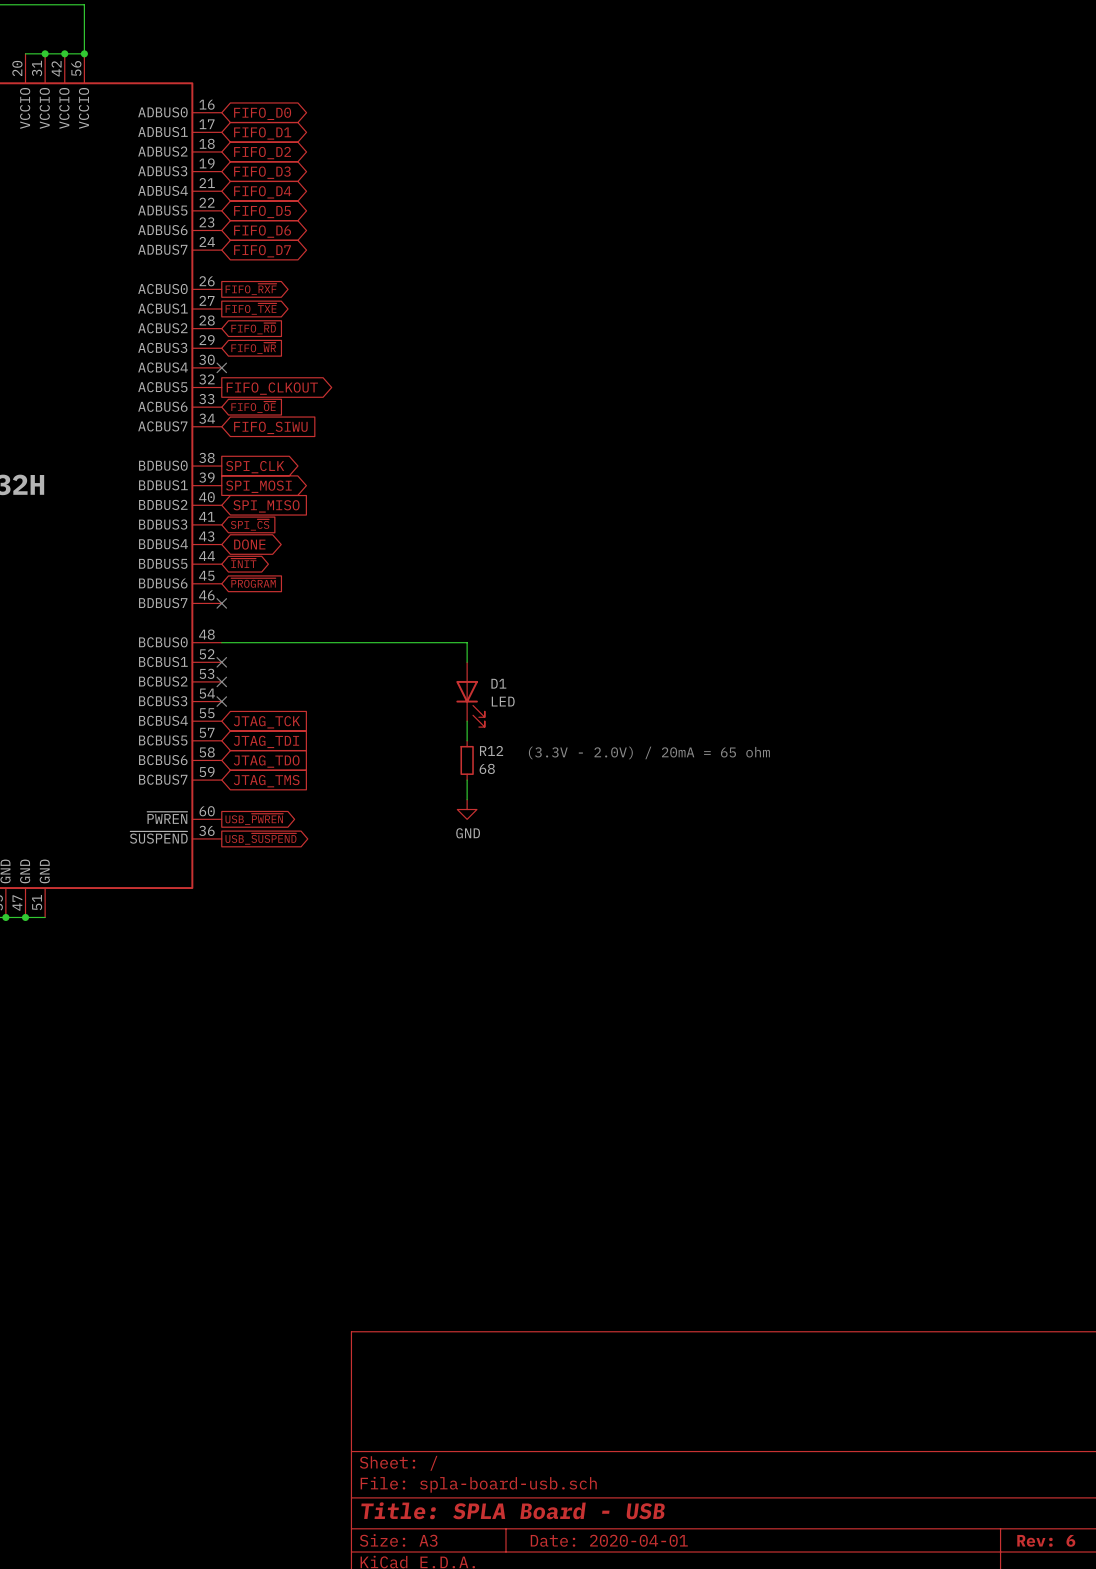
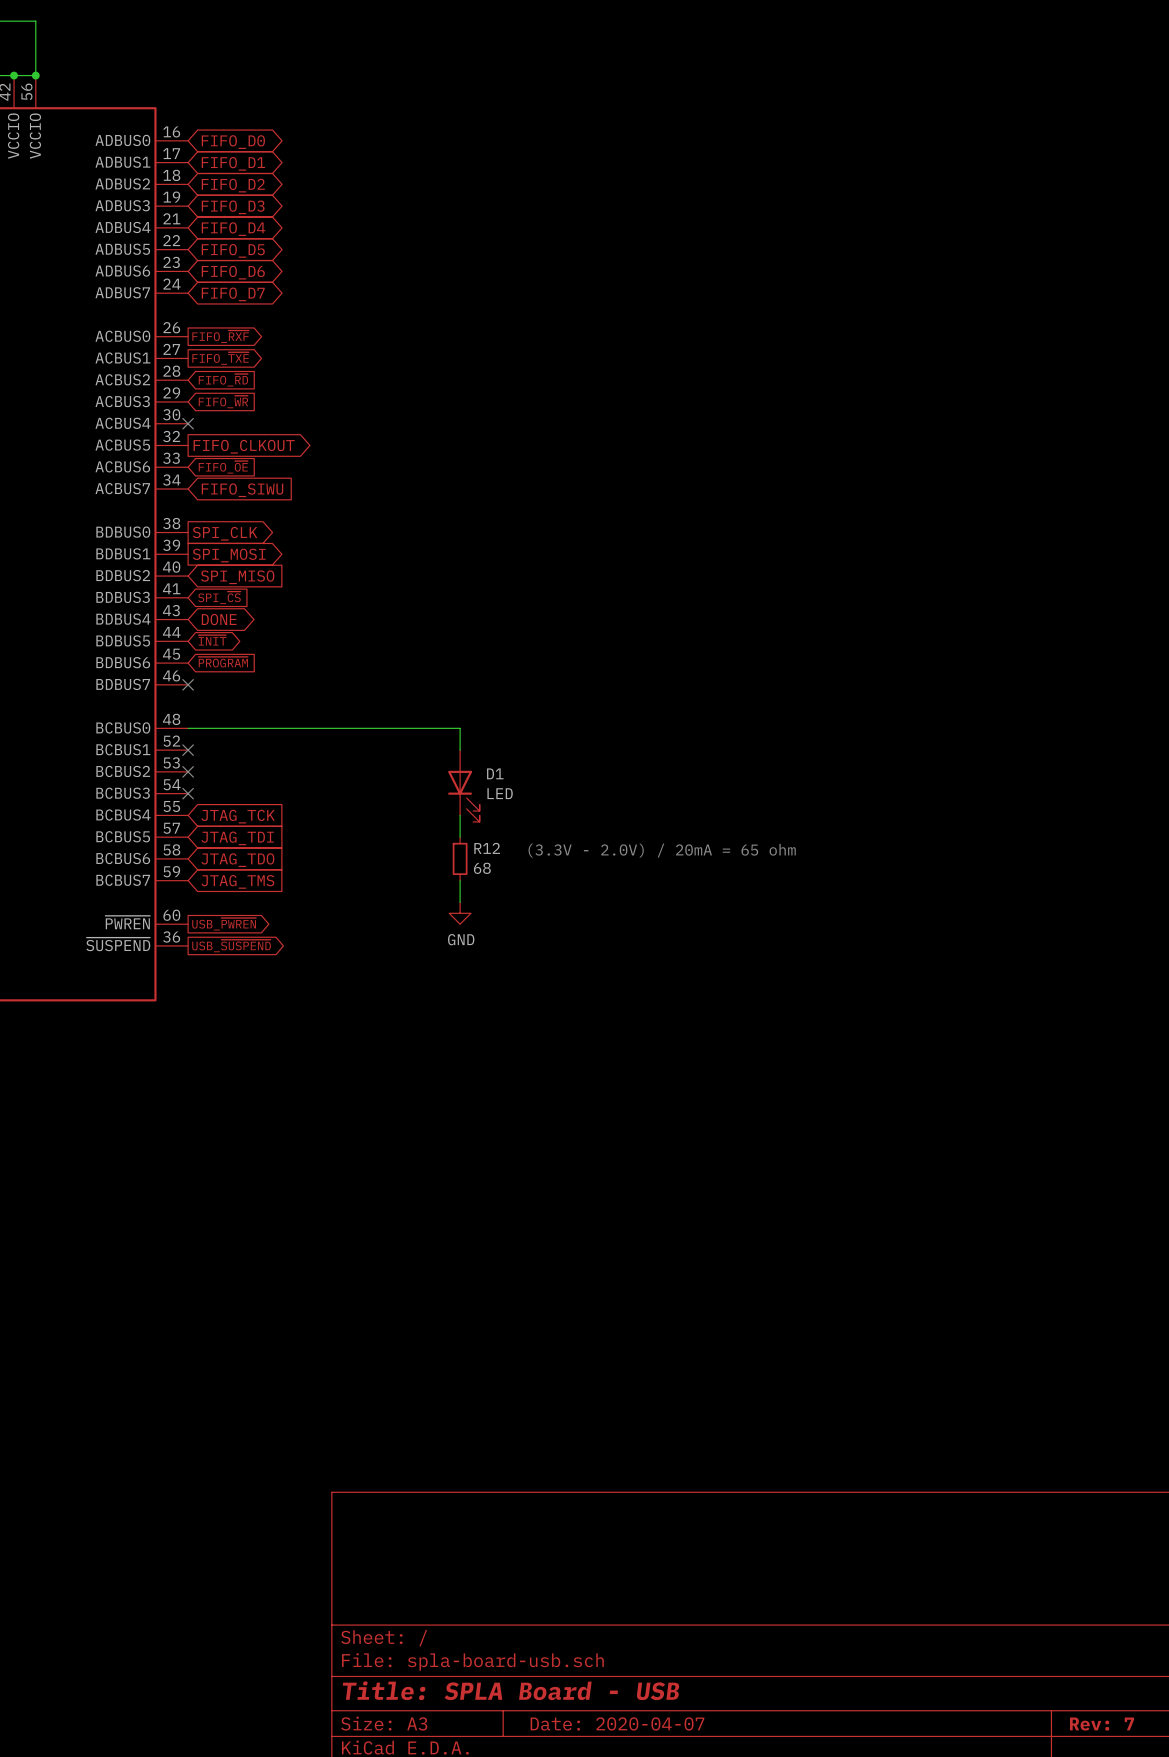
title block: Date: 2020-04-01 (609, 1540) -> Date: 2020-04-07 (617, 1723)
title block: Rev: 6 (1046, 1540) -> Rev: 7 (1101, 1724)

